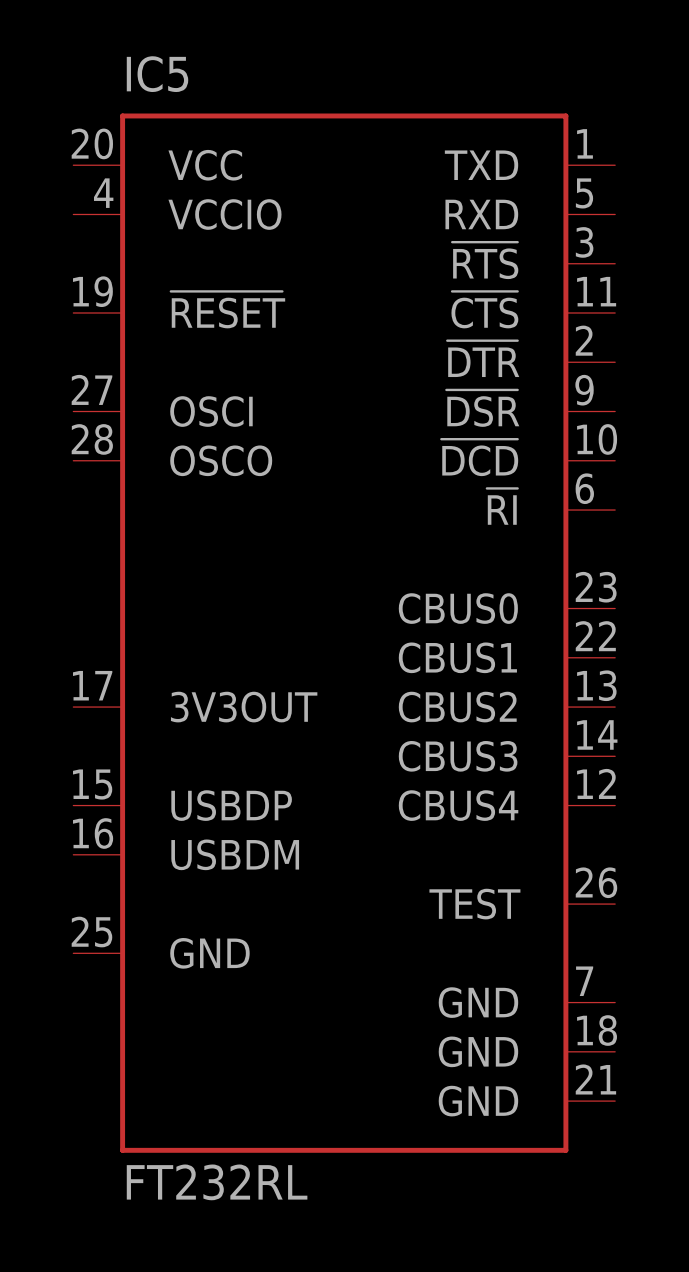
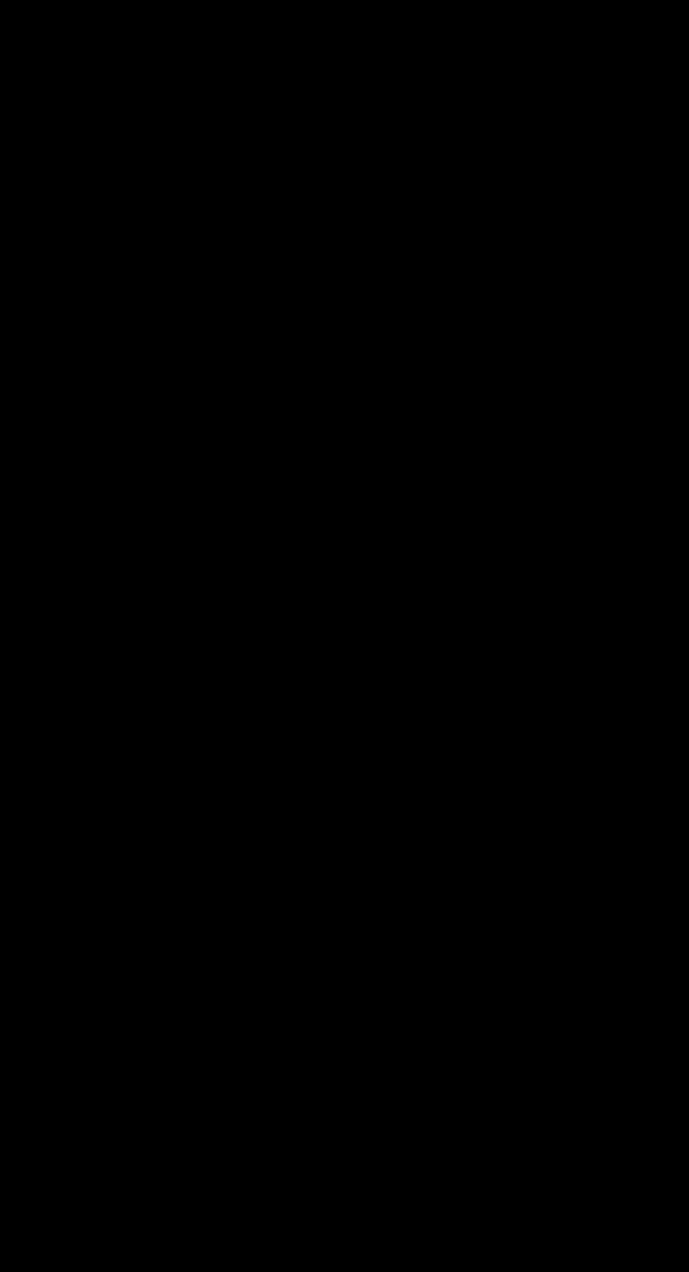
IC5: FT232RL (344, 633) -> none

